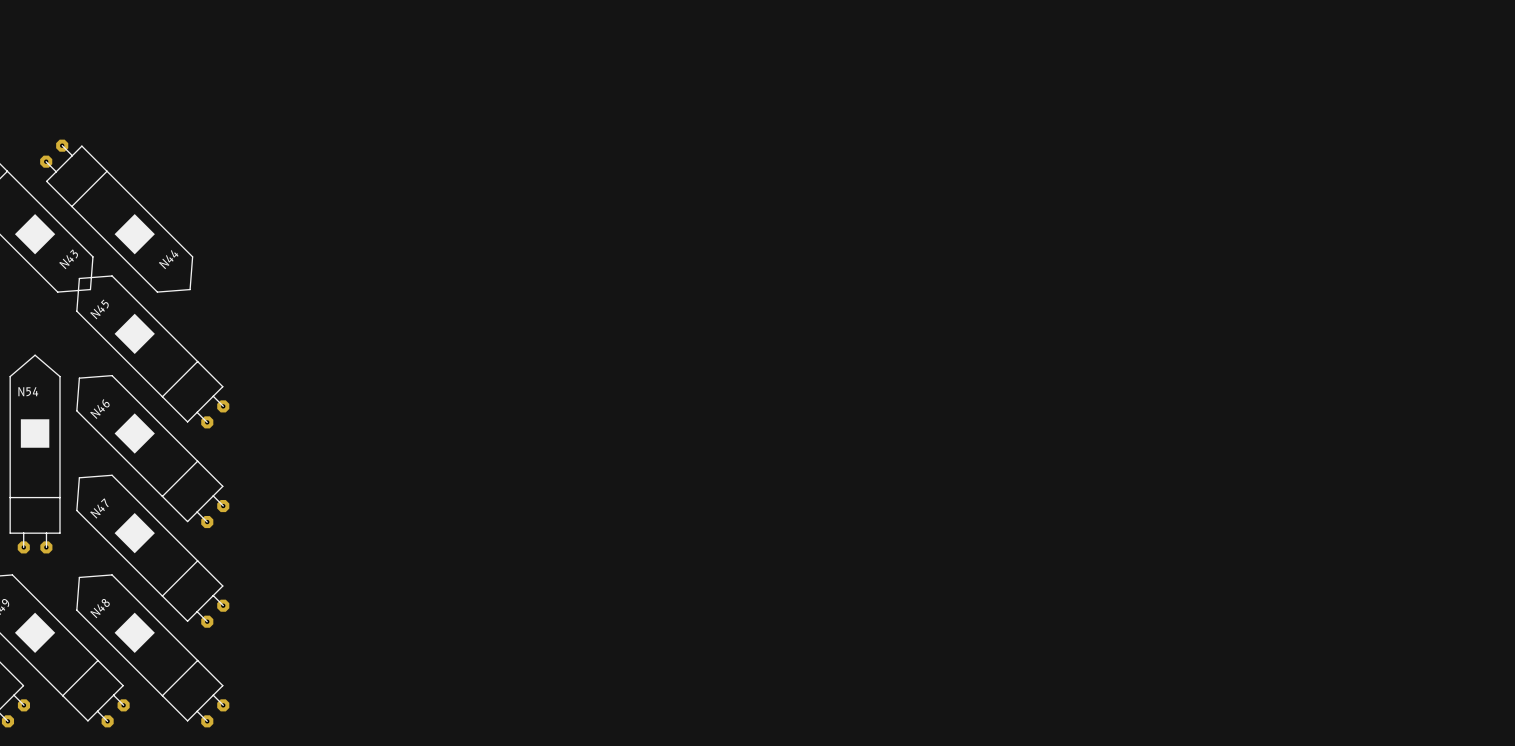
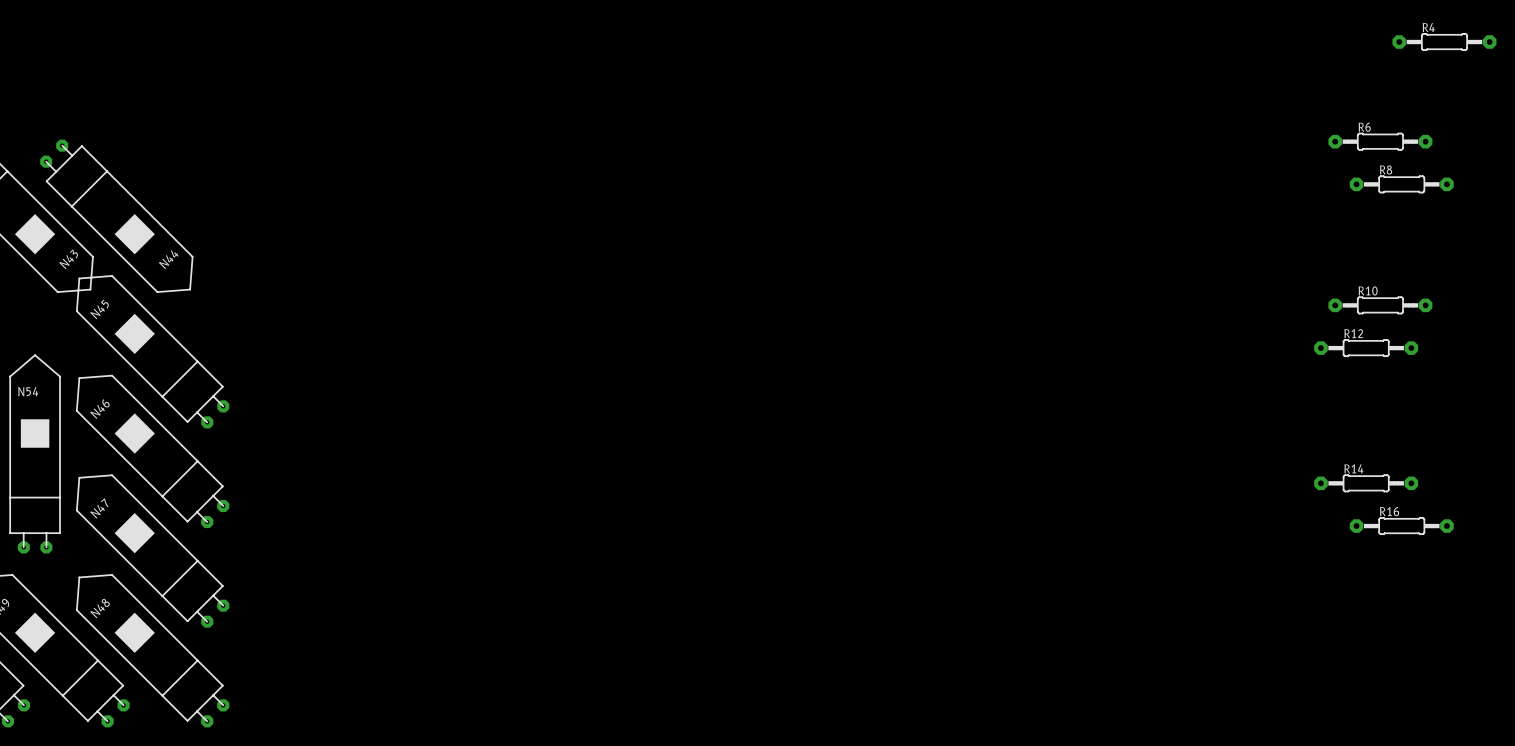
R4: none -> (1444, 42)
R6: none -> (1380, 141)
R8: none -> (1401, 184)
R10: none -> (1380, 305)
R12: none -> (1366, 348)
R14: none -> (1366, 483)
R16: none -> (1401, 526)

